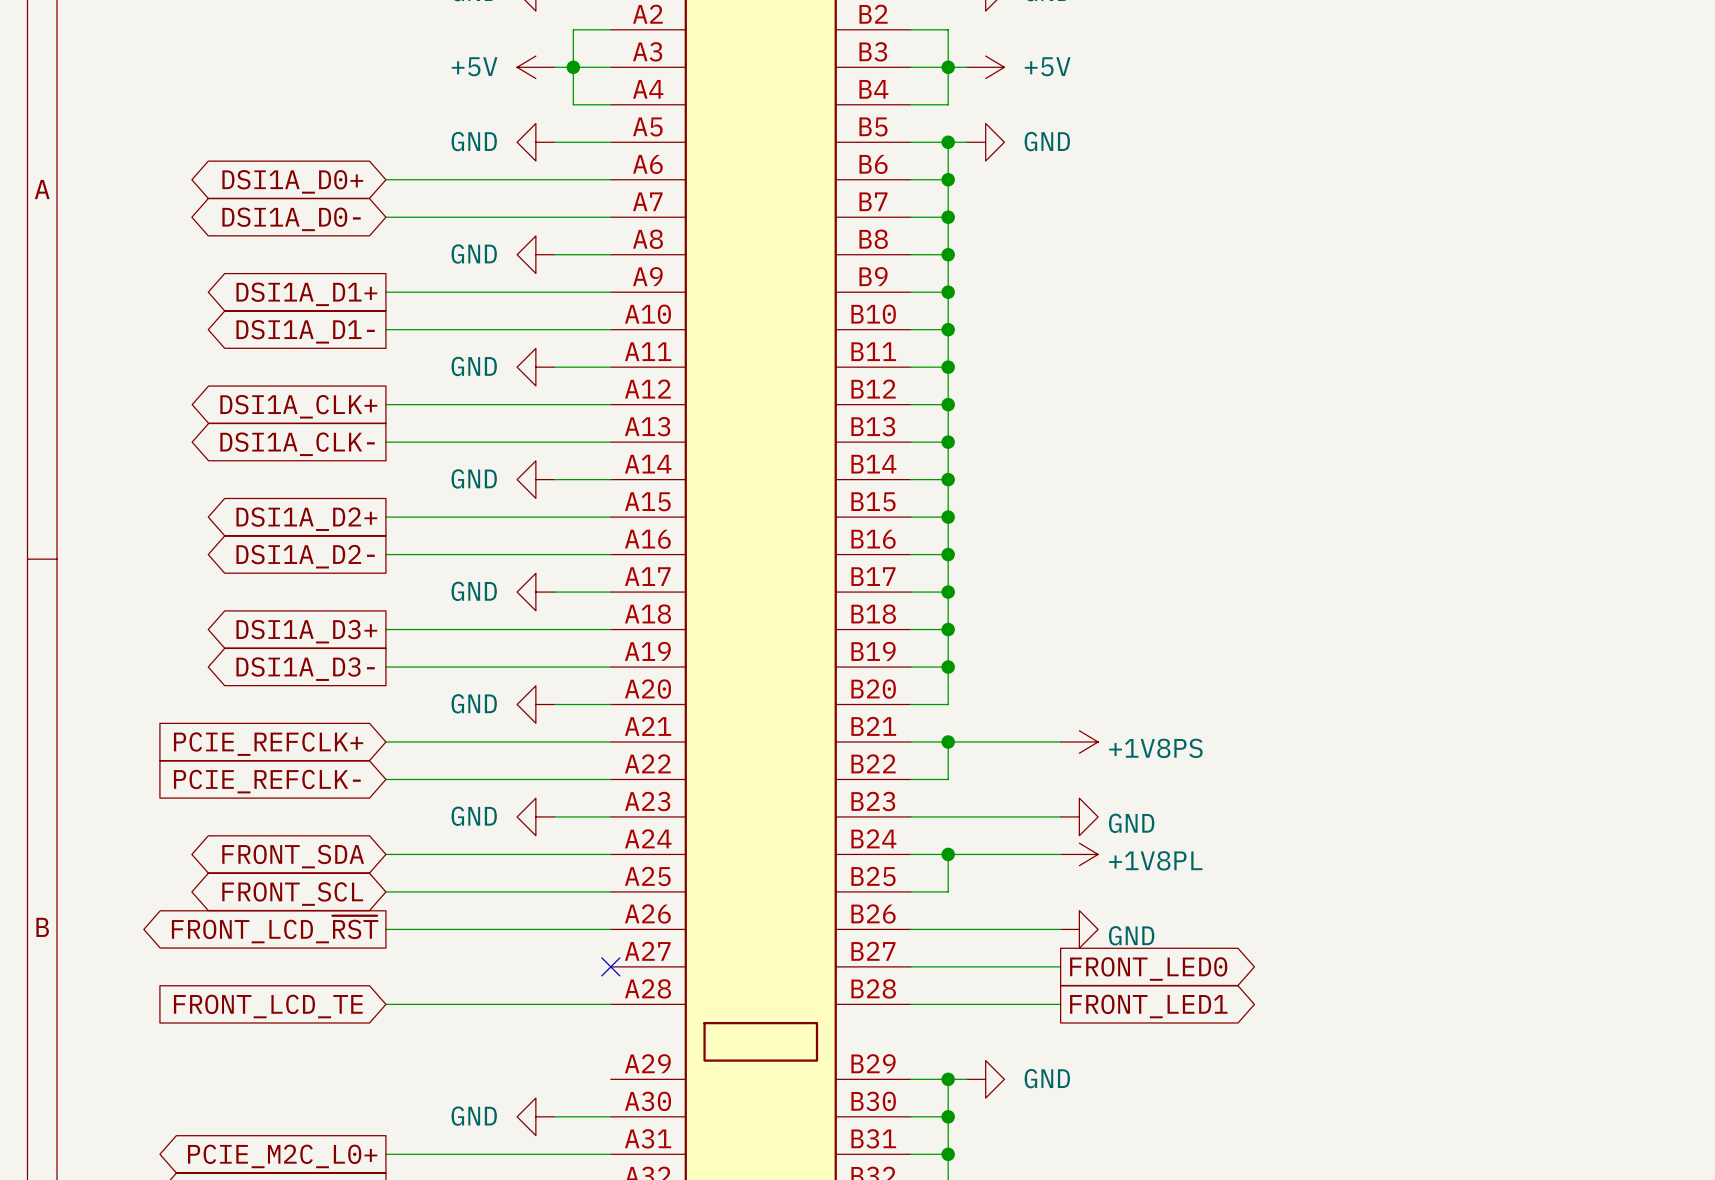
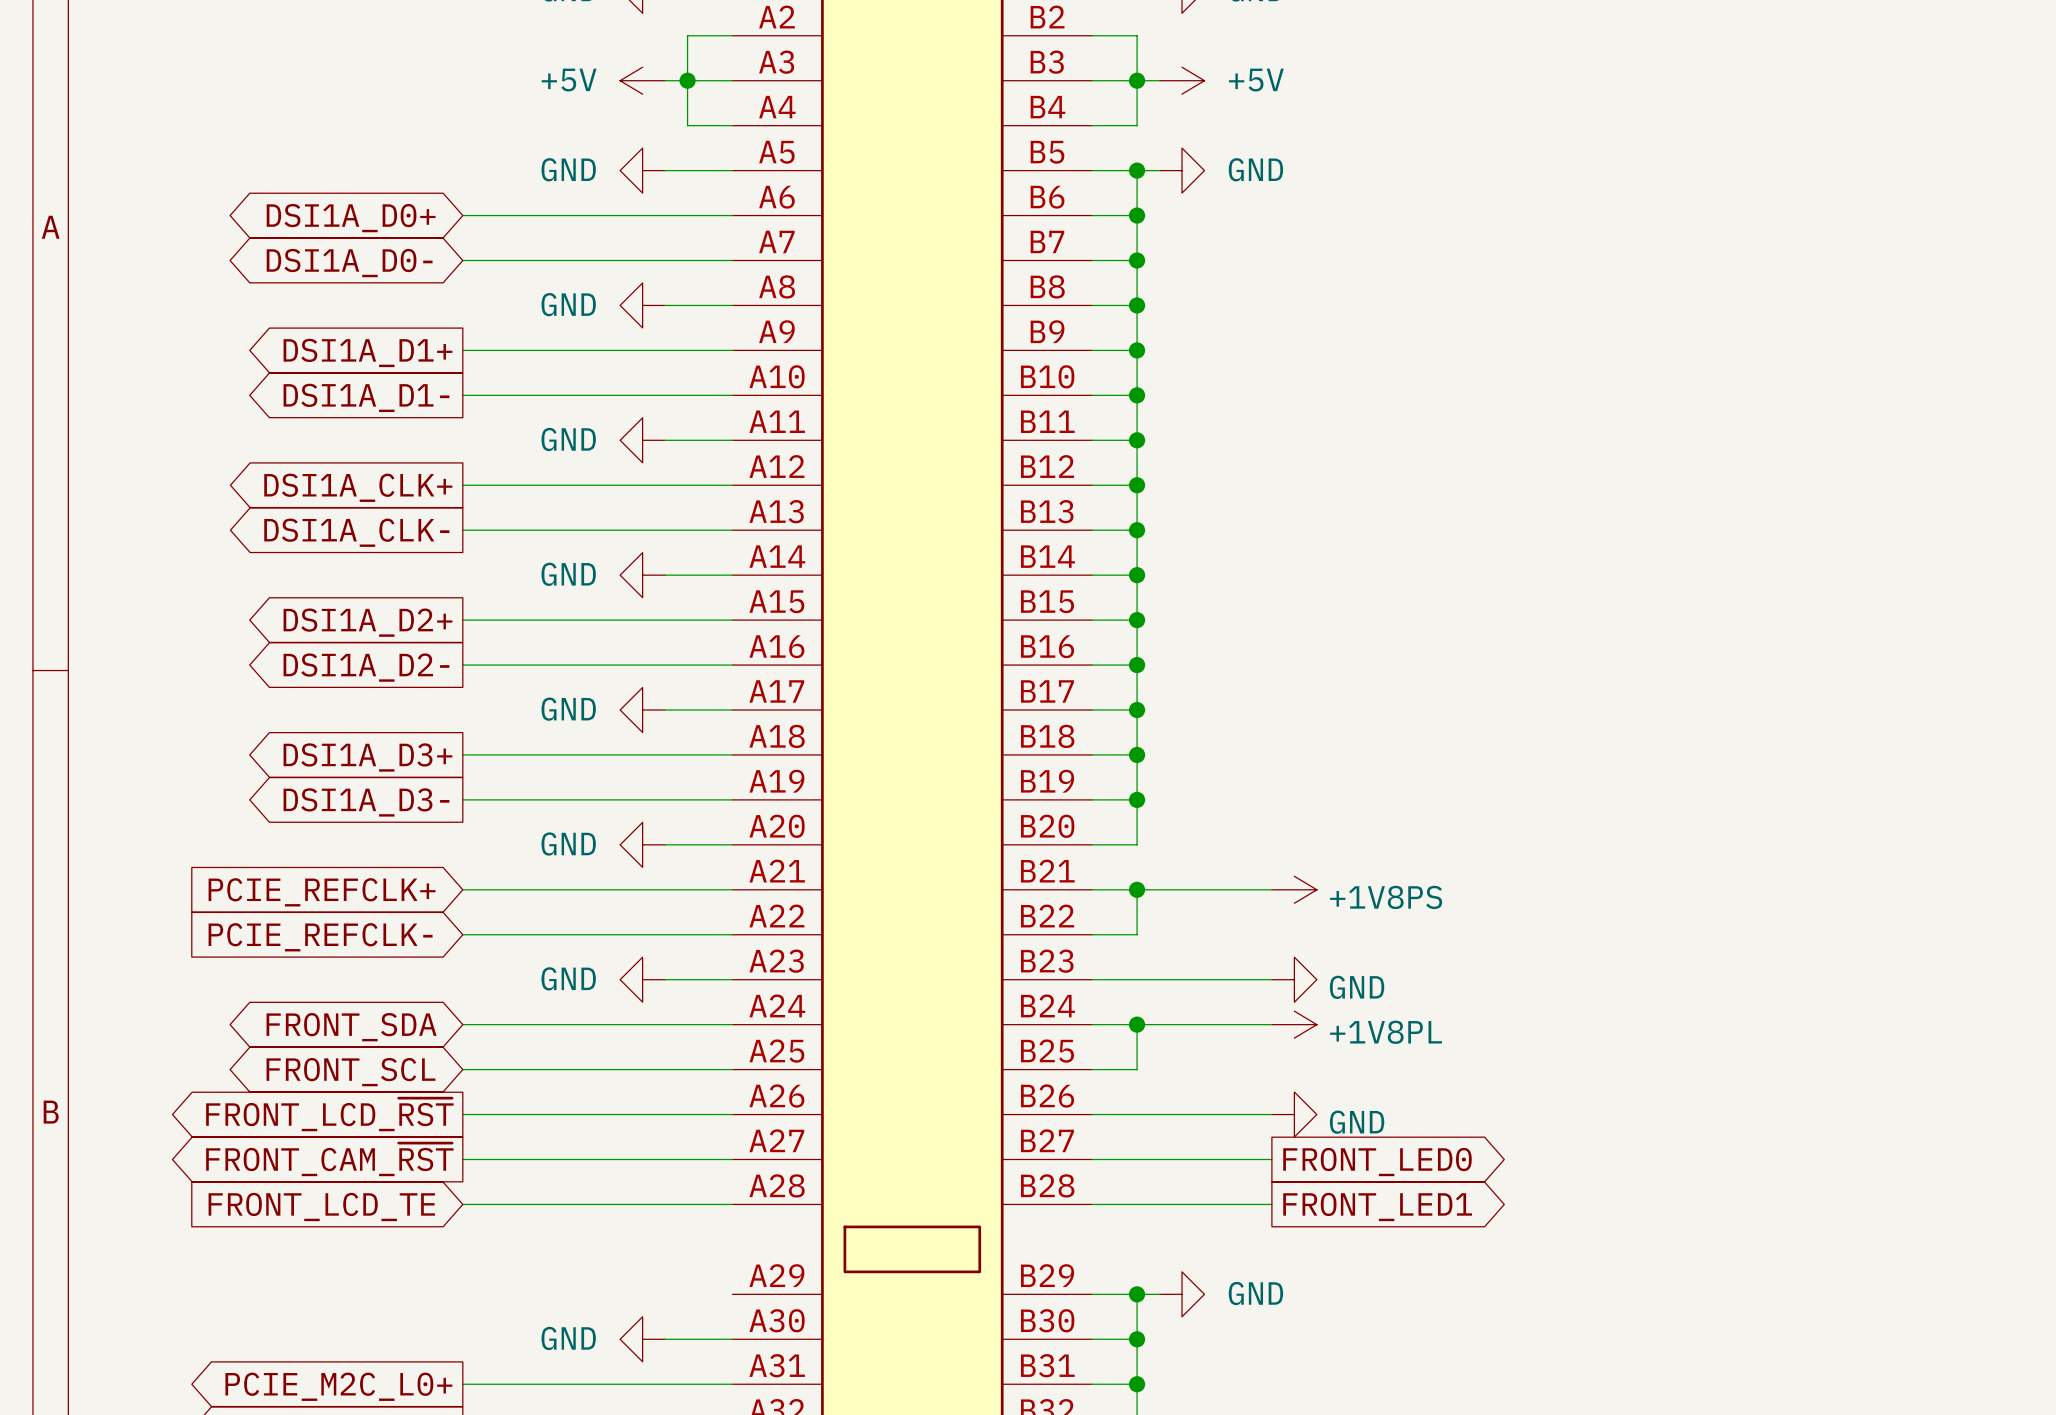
wire: none -> (462, 1159) (732, 1159)
no-connect mark: (610, 966) -> none
global label: none -> FRONT_CAM_~{RST} (329, 1159)

